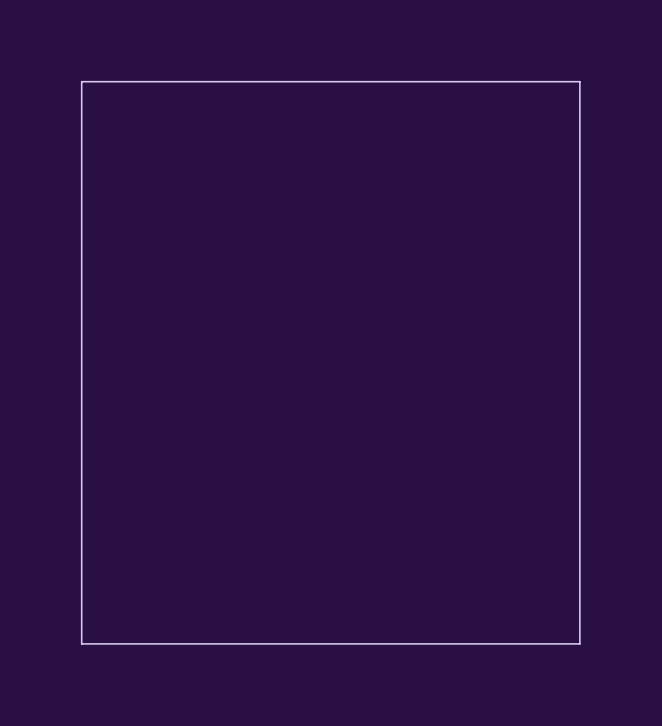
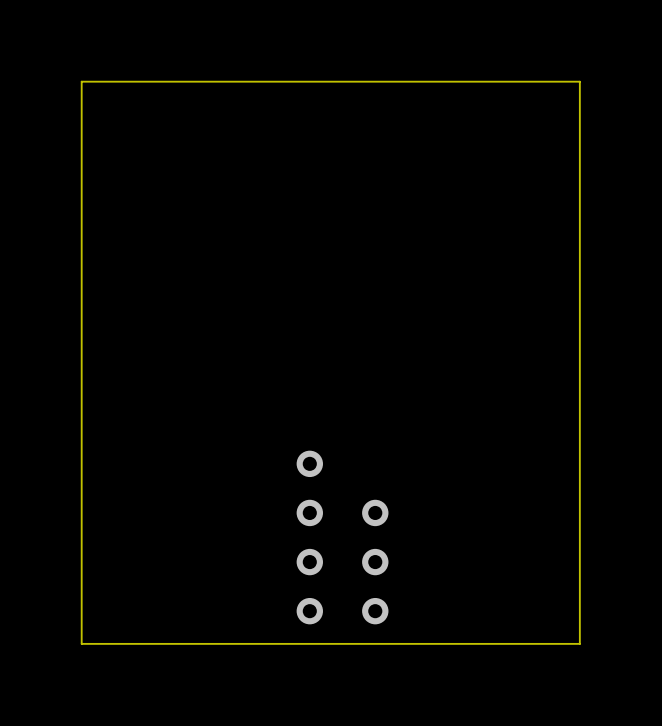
via: none -> (309, 463)
via: none -> (309, 512)
via: none -> (375, 512)
via: none -> (309, 562)
via: none -> (375, 562)
via: none -> (309, 611)
via: none -> (375, 611)

